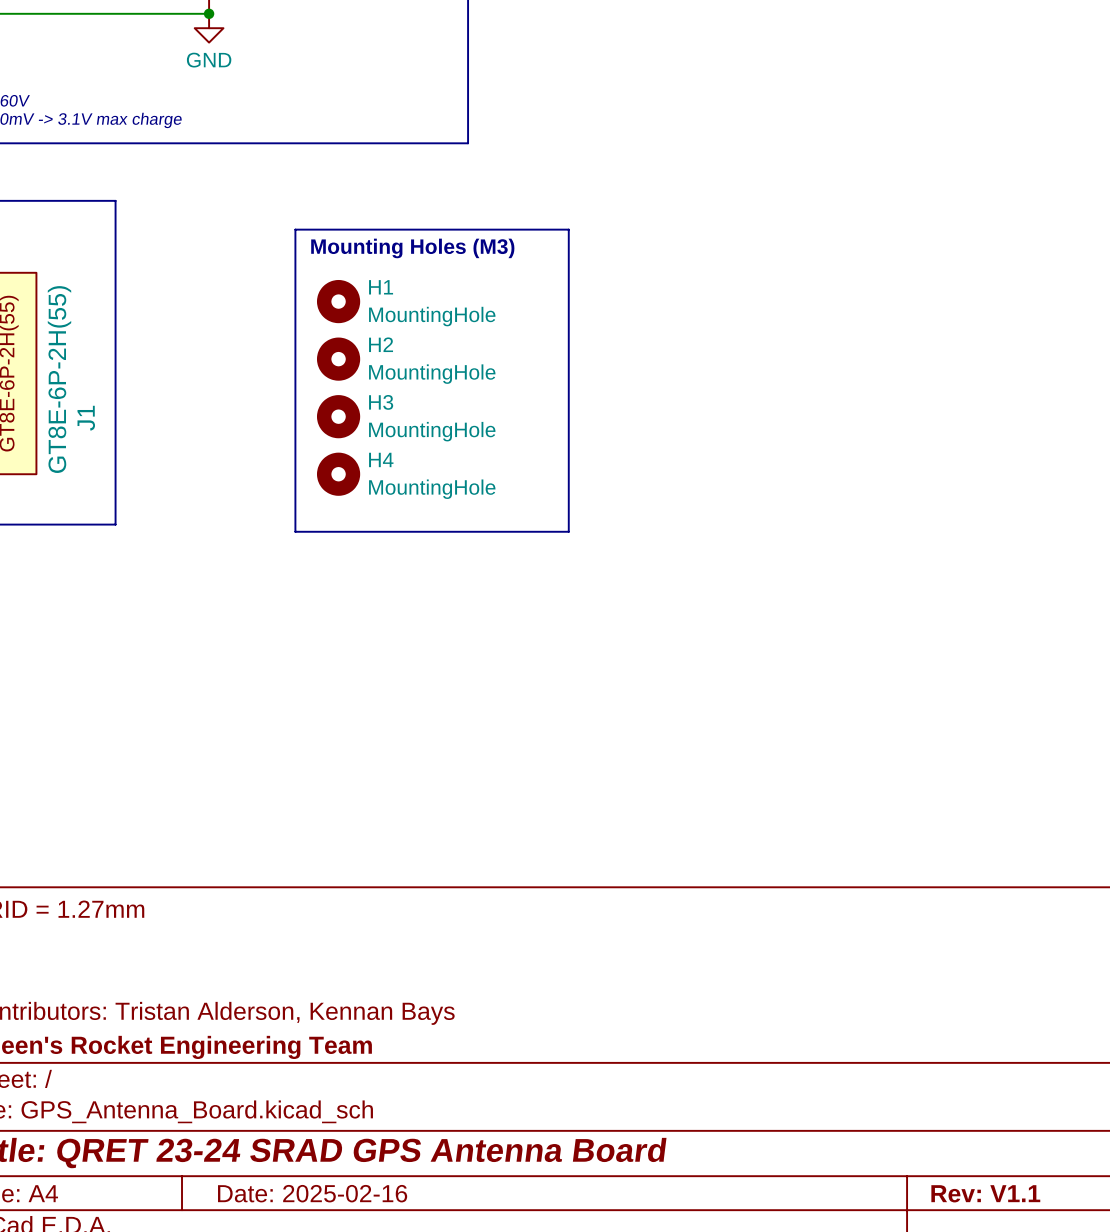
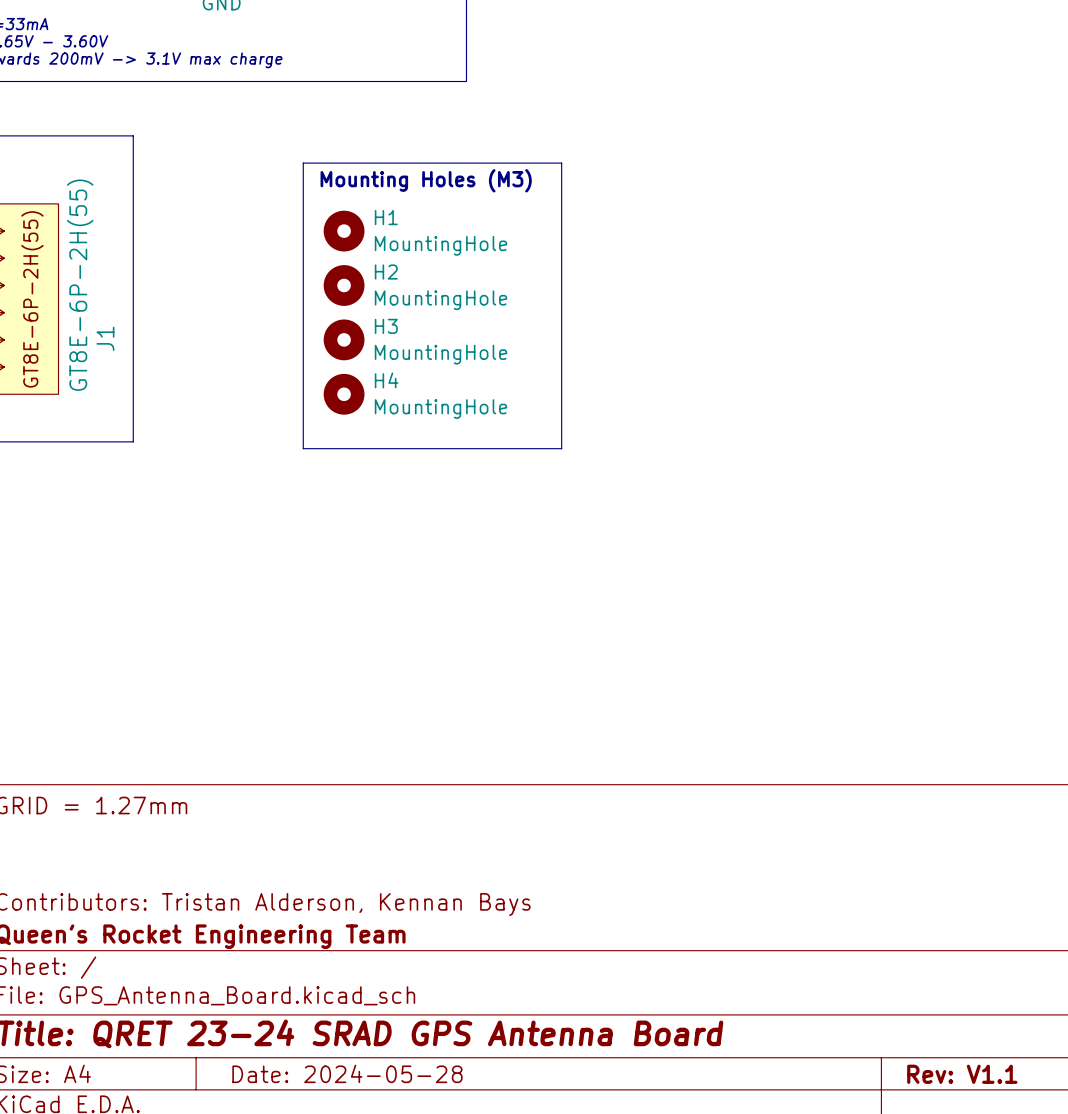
title block: Date: 2025-02-16 (312, 1193) -> Date: 2024-05-28 (347, 1073)

